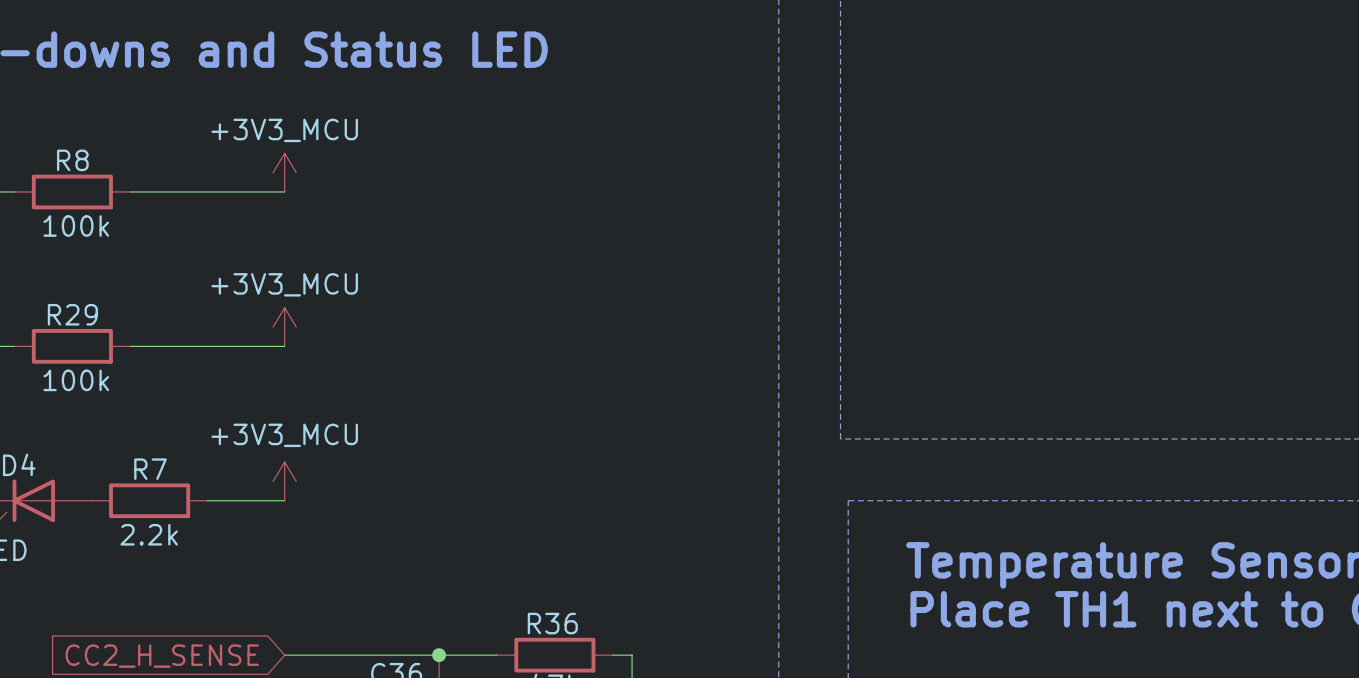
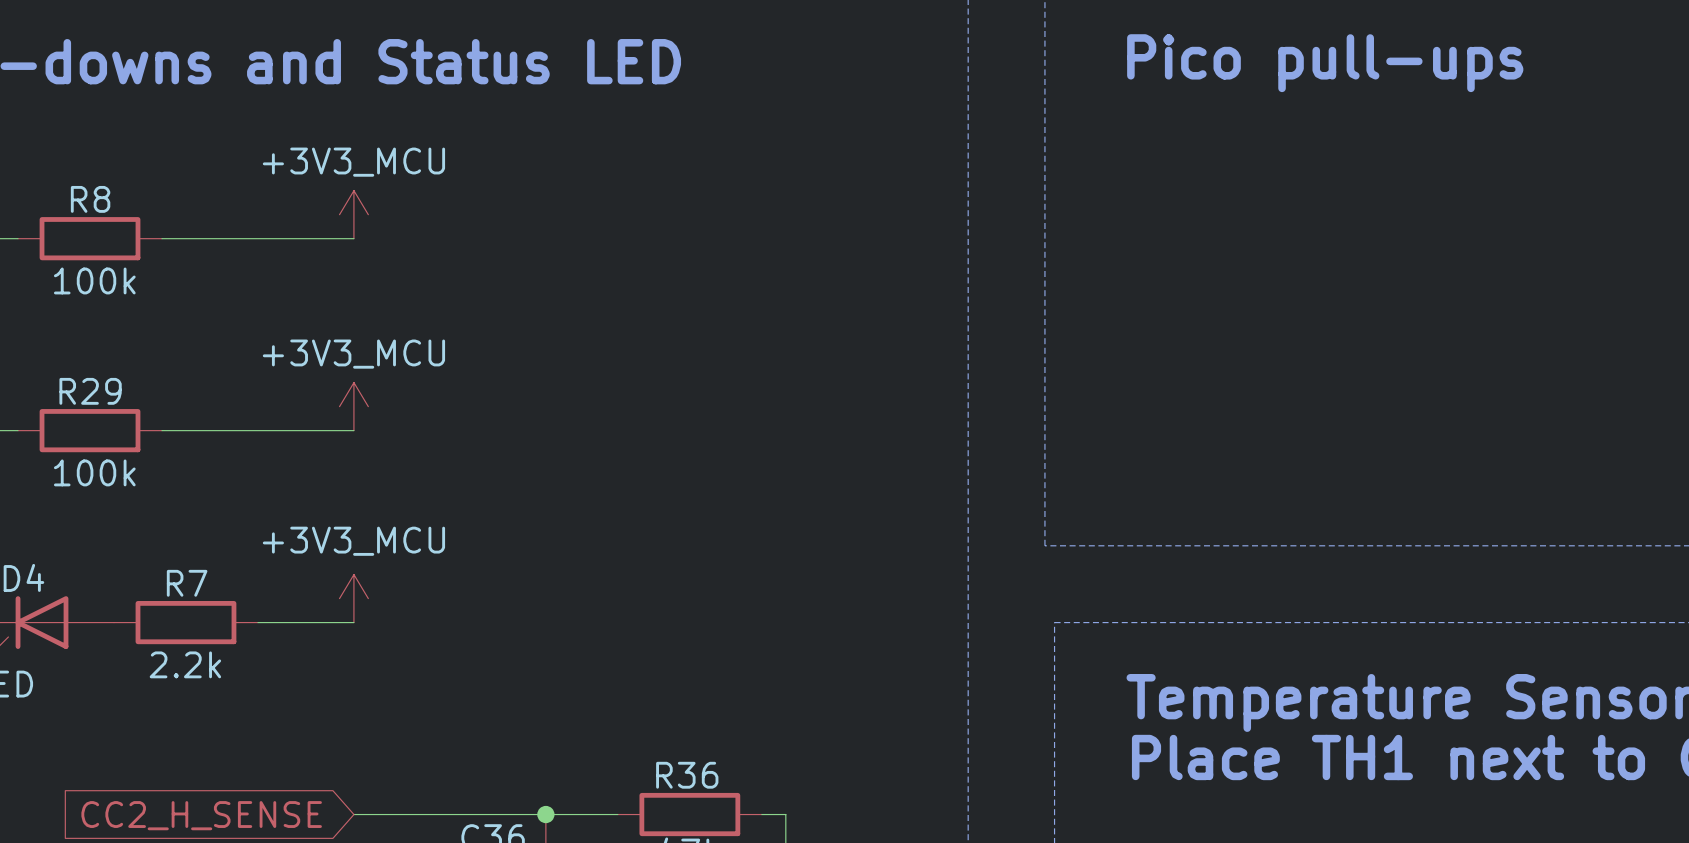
text: none -> Pico pull-ups (1325, 63)

